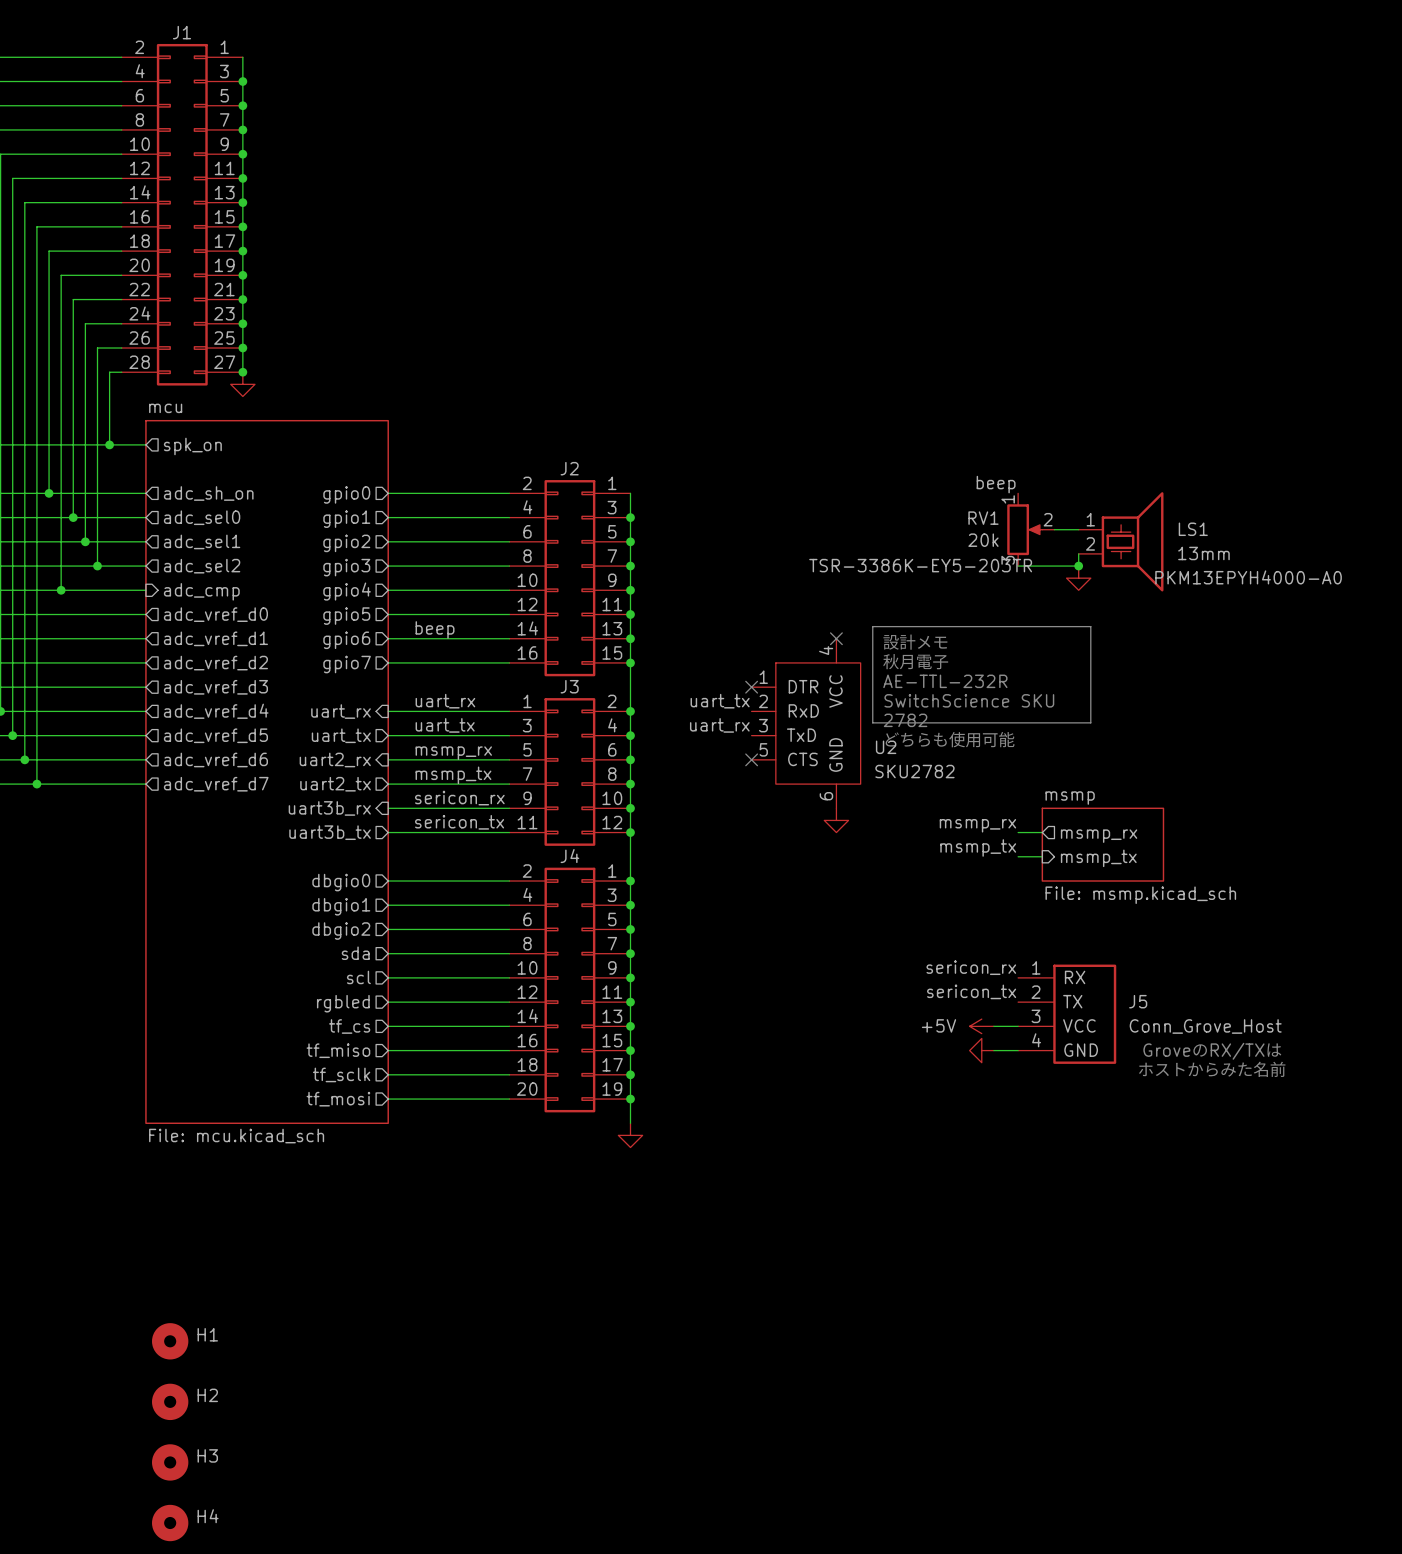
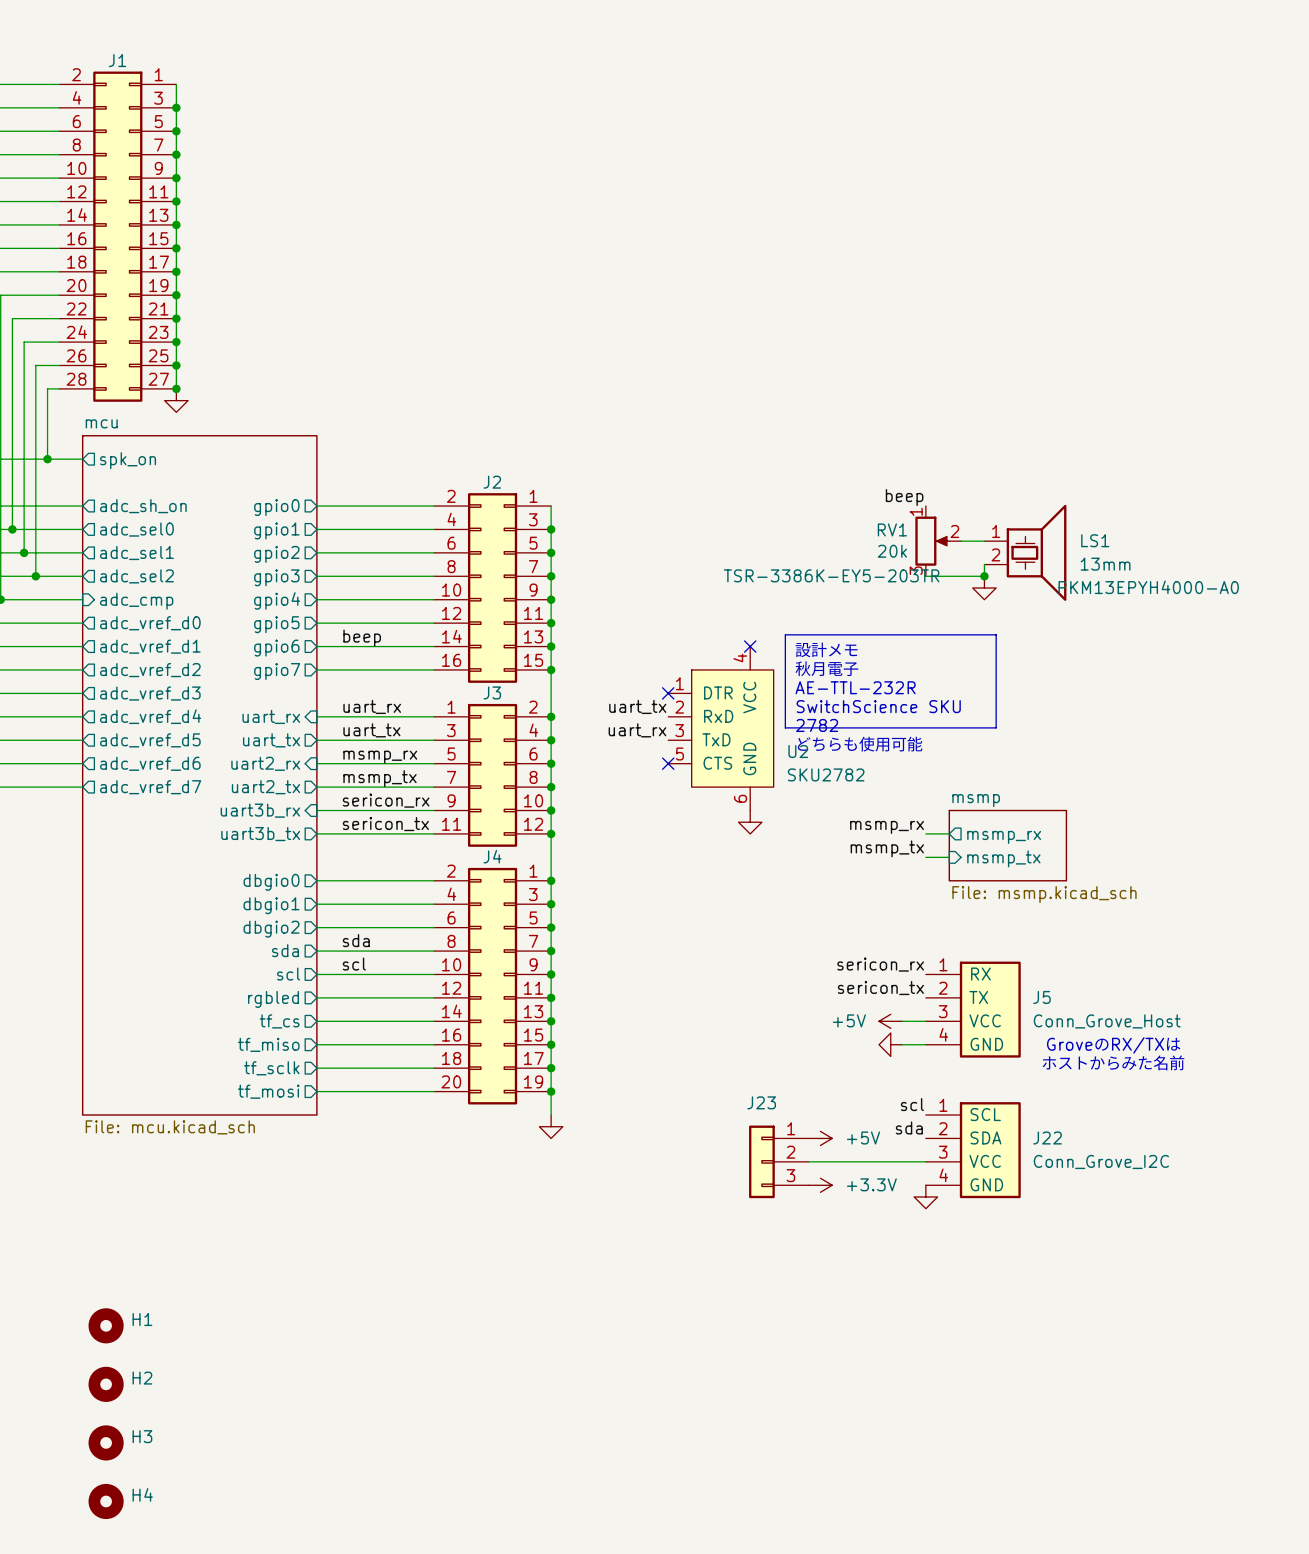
label: none -> sda (356, 940)
label: none -> scl (354, 964)
label: none -> scl (912, 1104)
label: none -> sda (909, 1127)
power symbol: none -> +5V (820, 1138)
J22: none -> Conn_Grove_I2C (973, 1150)
J23: none -> (778, 1161)
wire: none -> (808, 1161) (925, 1161)
power symbol: none -> +3.3V (820, 1185)
power symbol: none -> (925, 1196)

